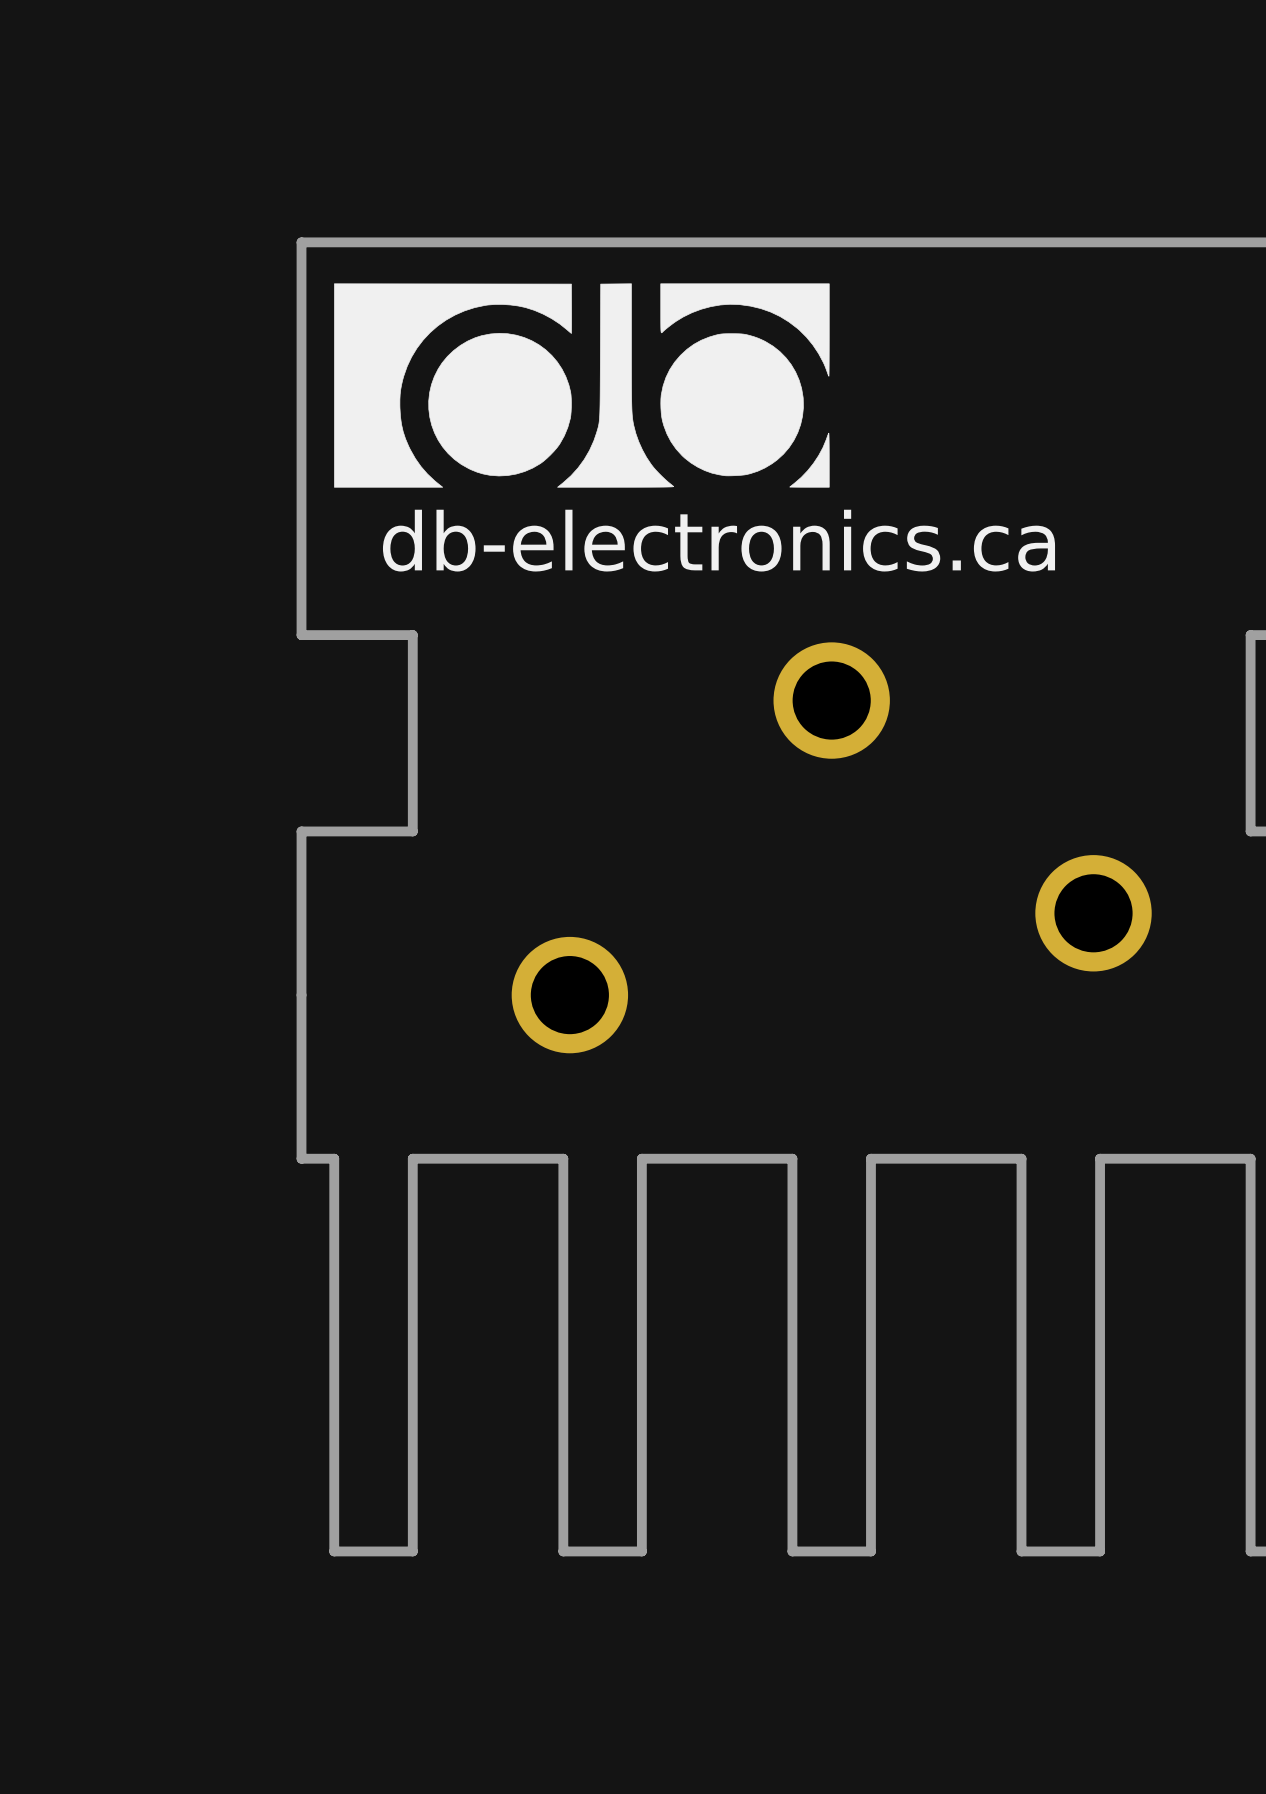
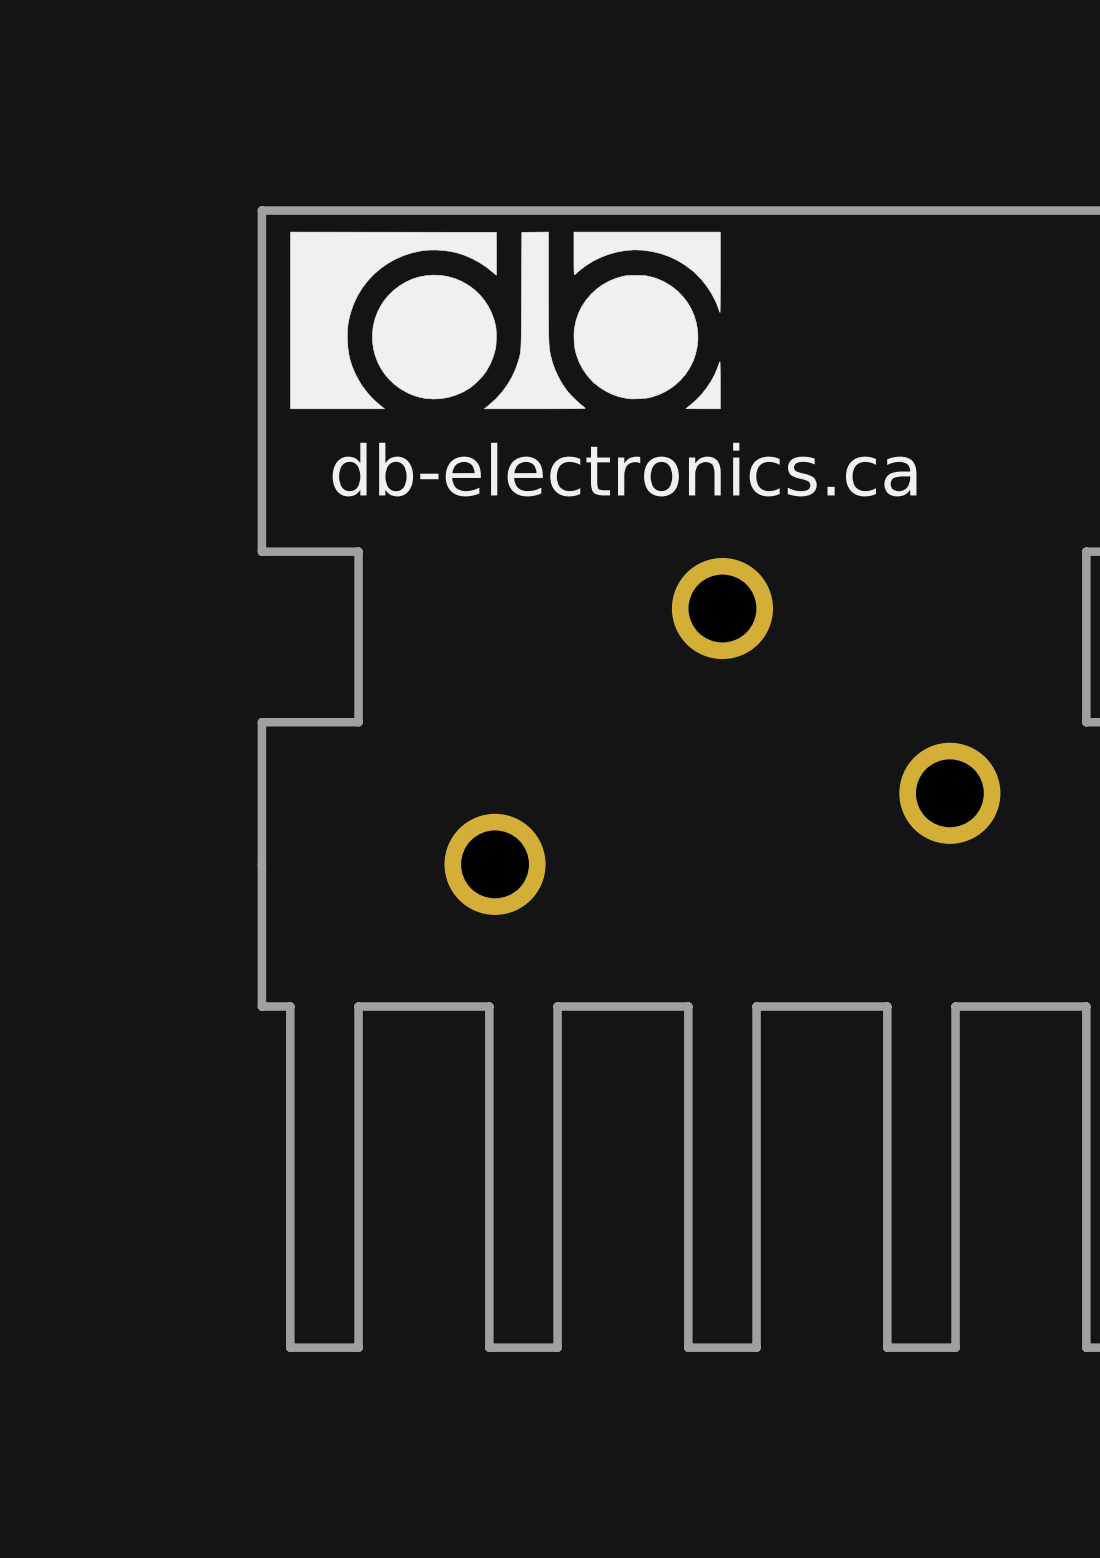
drawing position: (581, 385) -> (505, 320)

